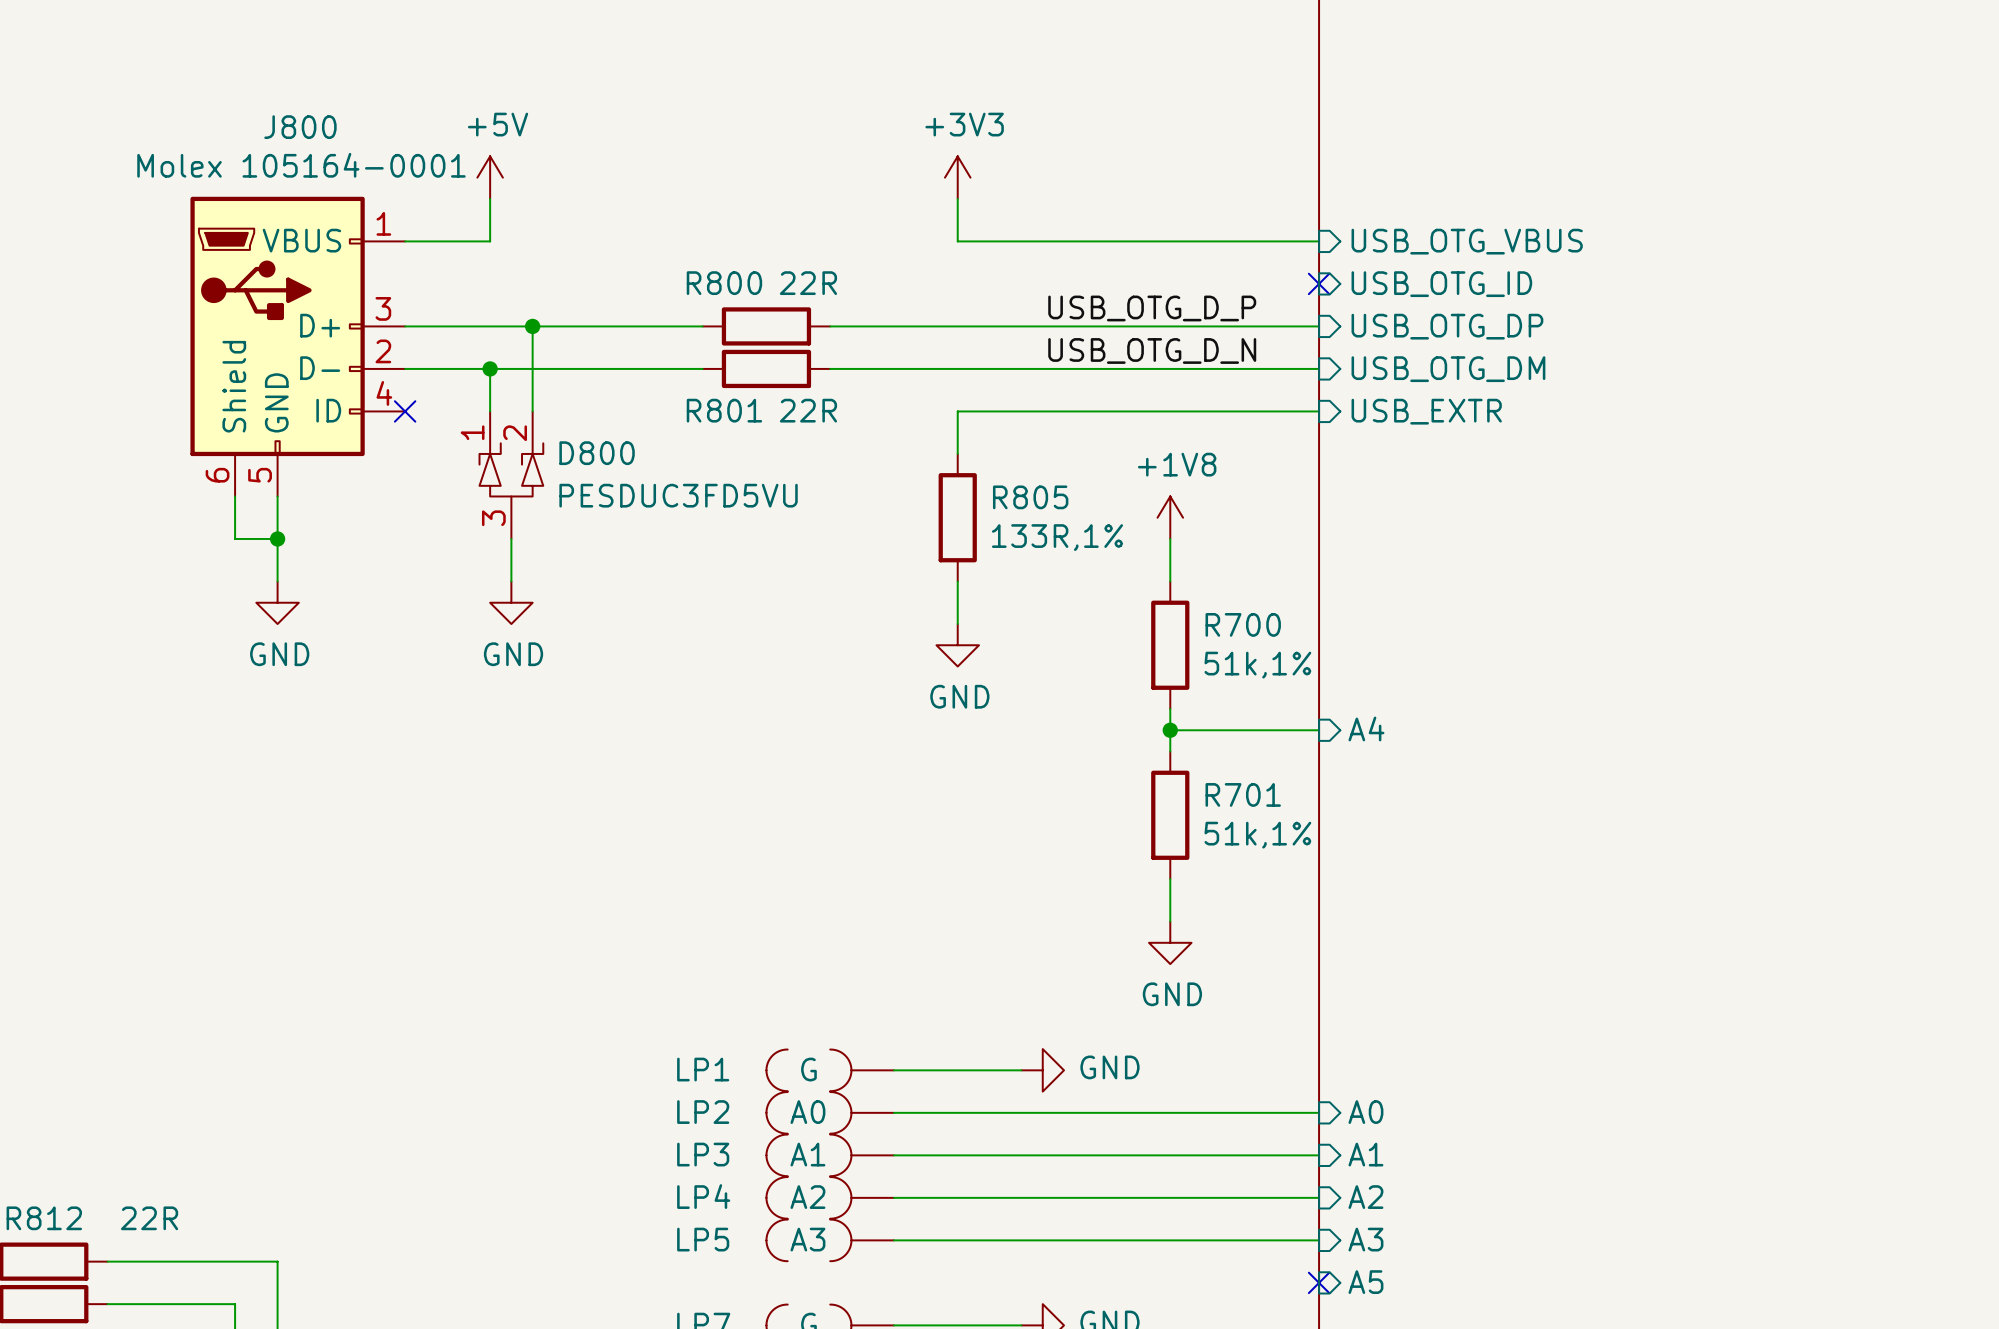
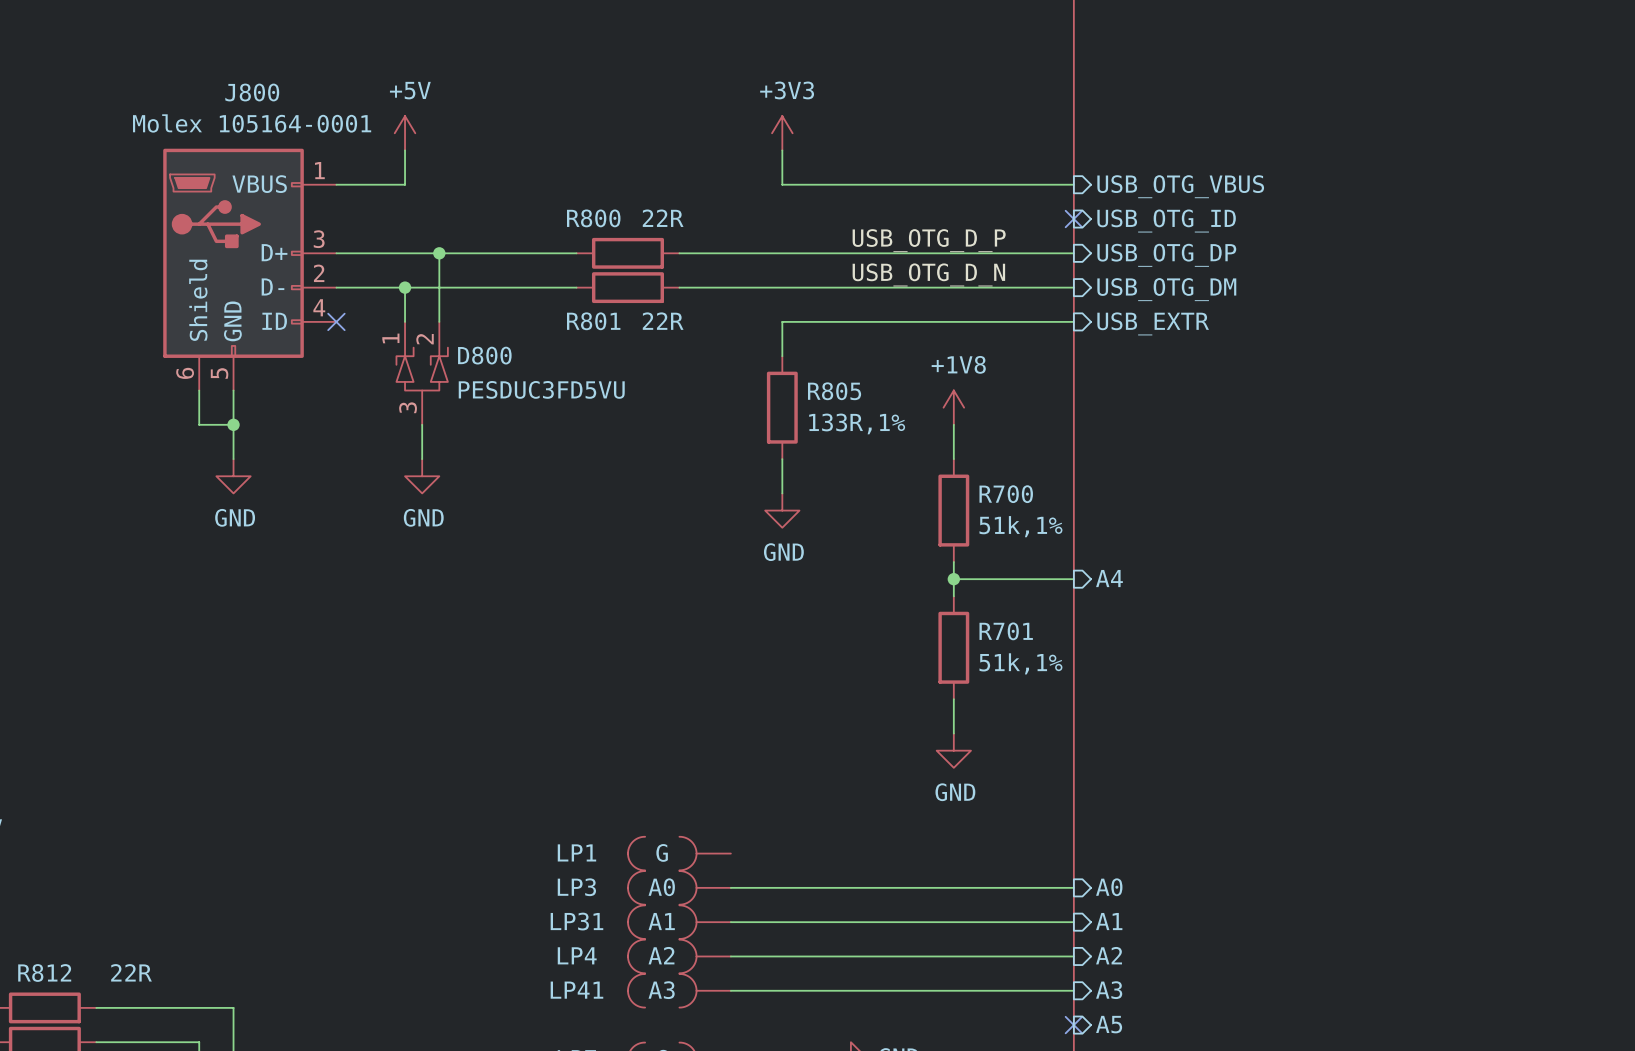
wire: (893, 1070) (1021, 1070) -> none
power symbol: GND (1042, 1070) -> none
LP2 name: LP2 (703, 1112) -> LP3 (576, 887)
LP3 name: LP3 (703, 1154) -> LP31 (576, 921)
LP5 name: LP5 (703, 1239) -> LP41 (576, 990)

